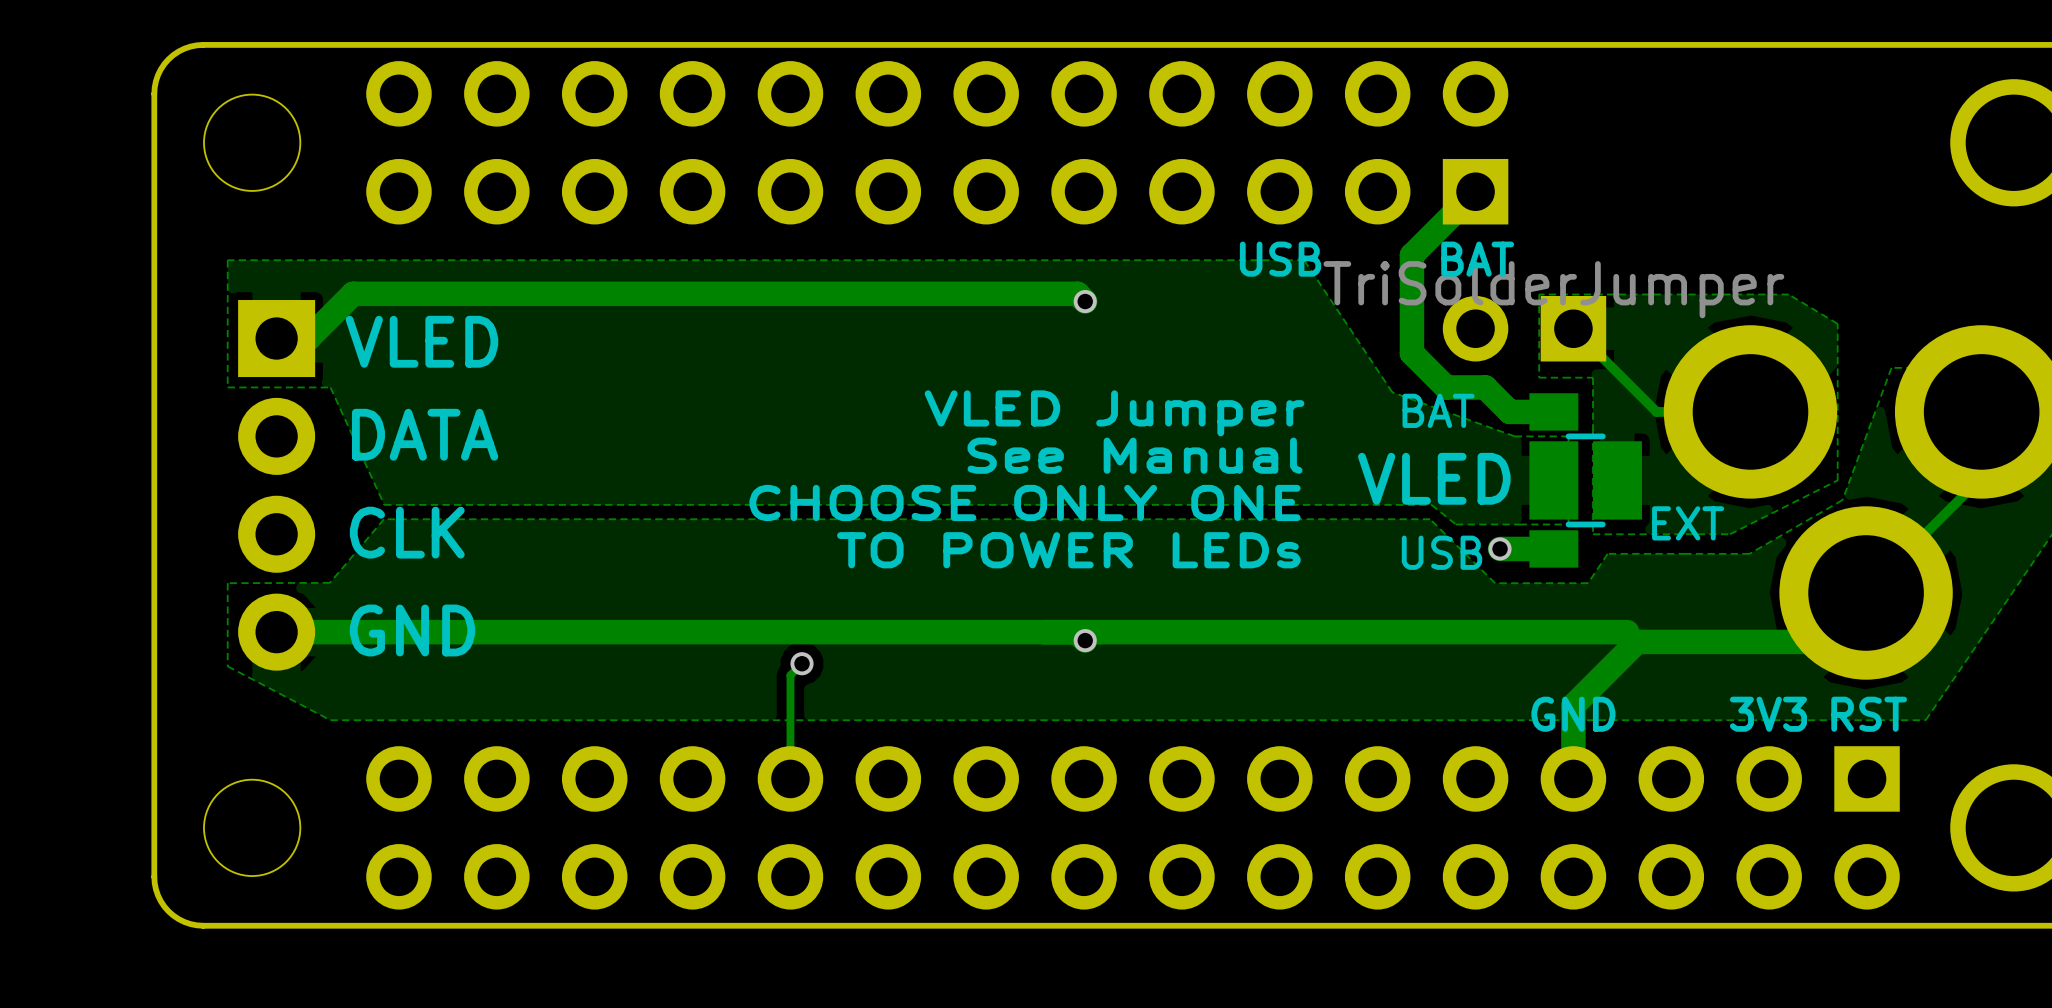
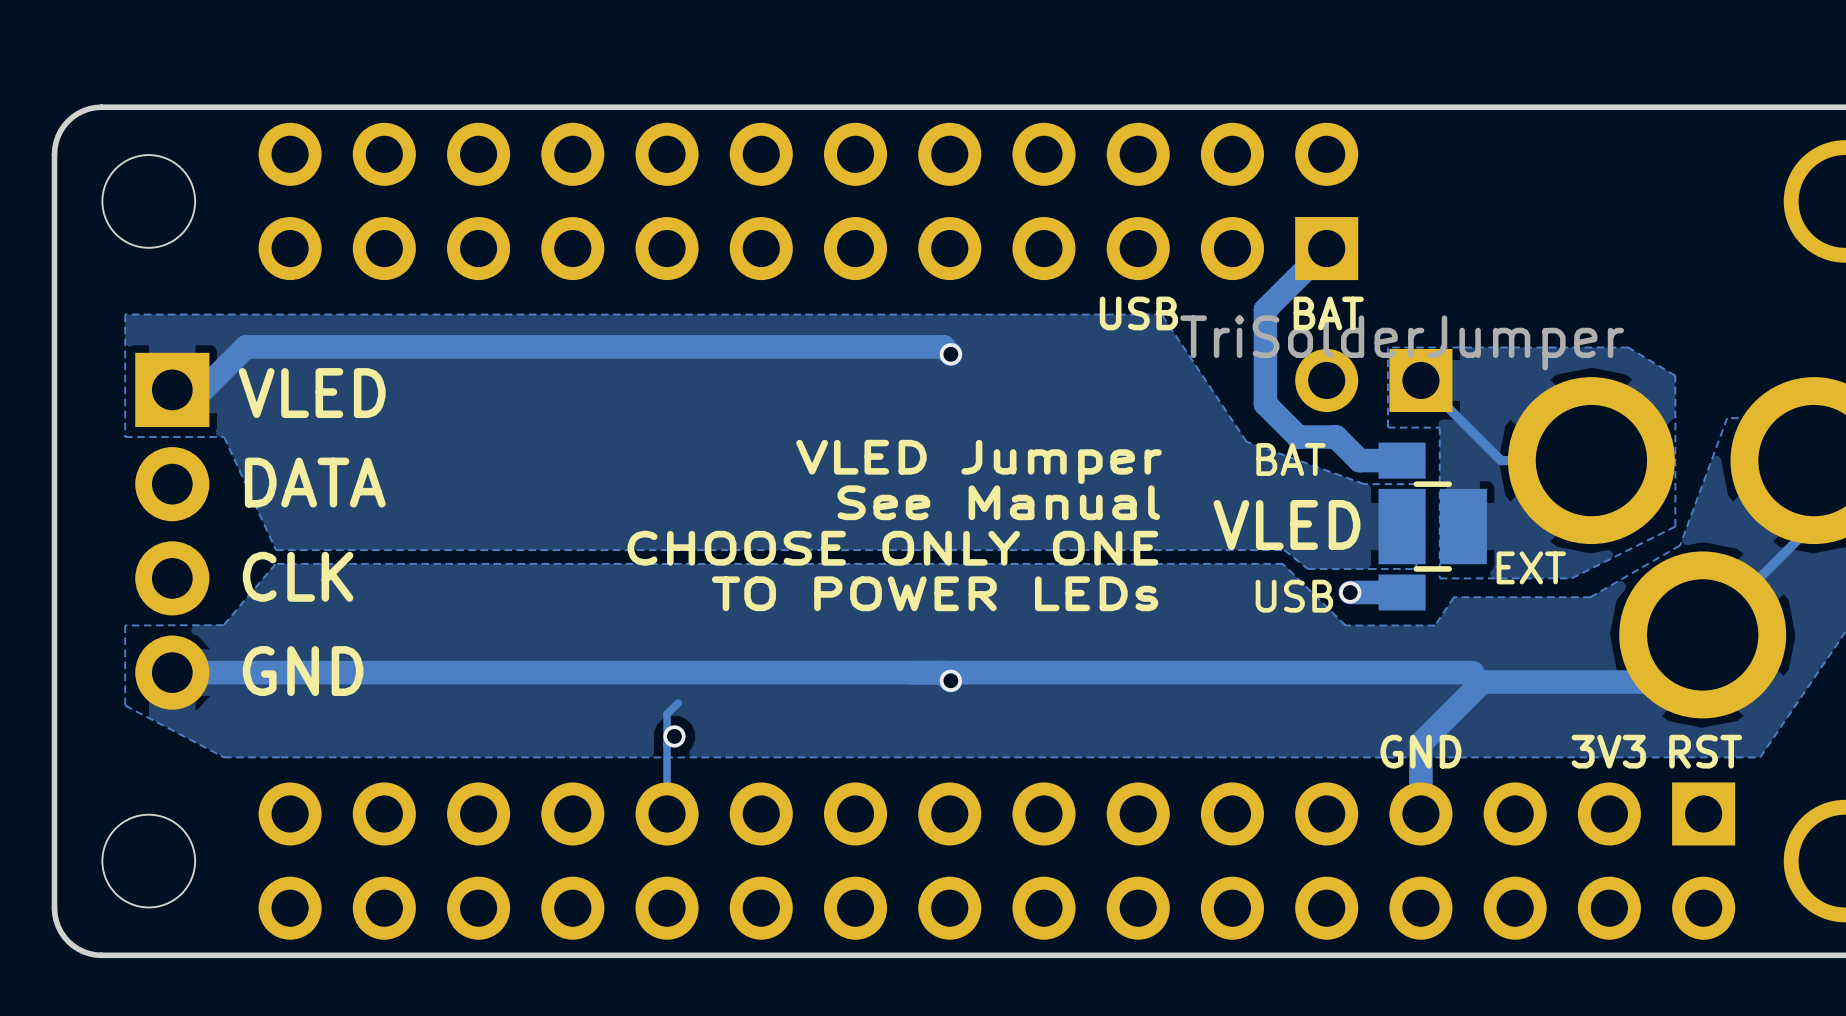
via position: (802, 663) -> (674, 736)

